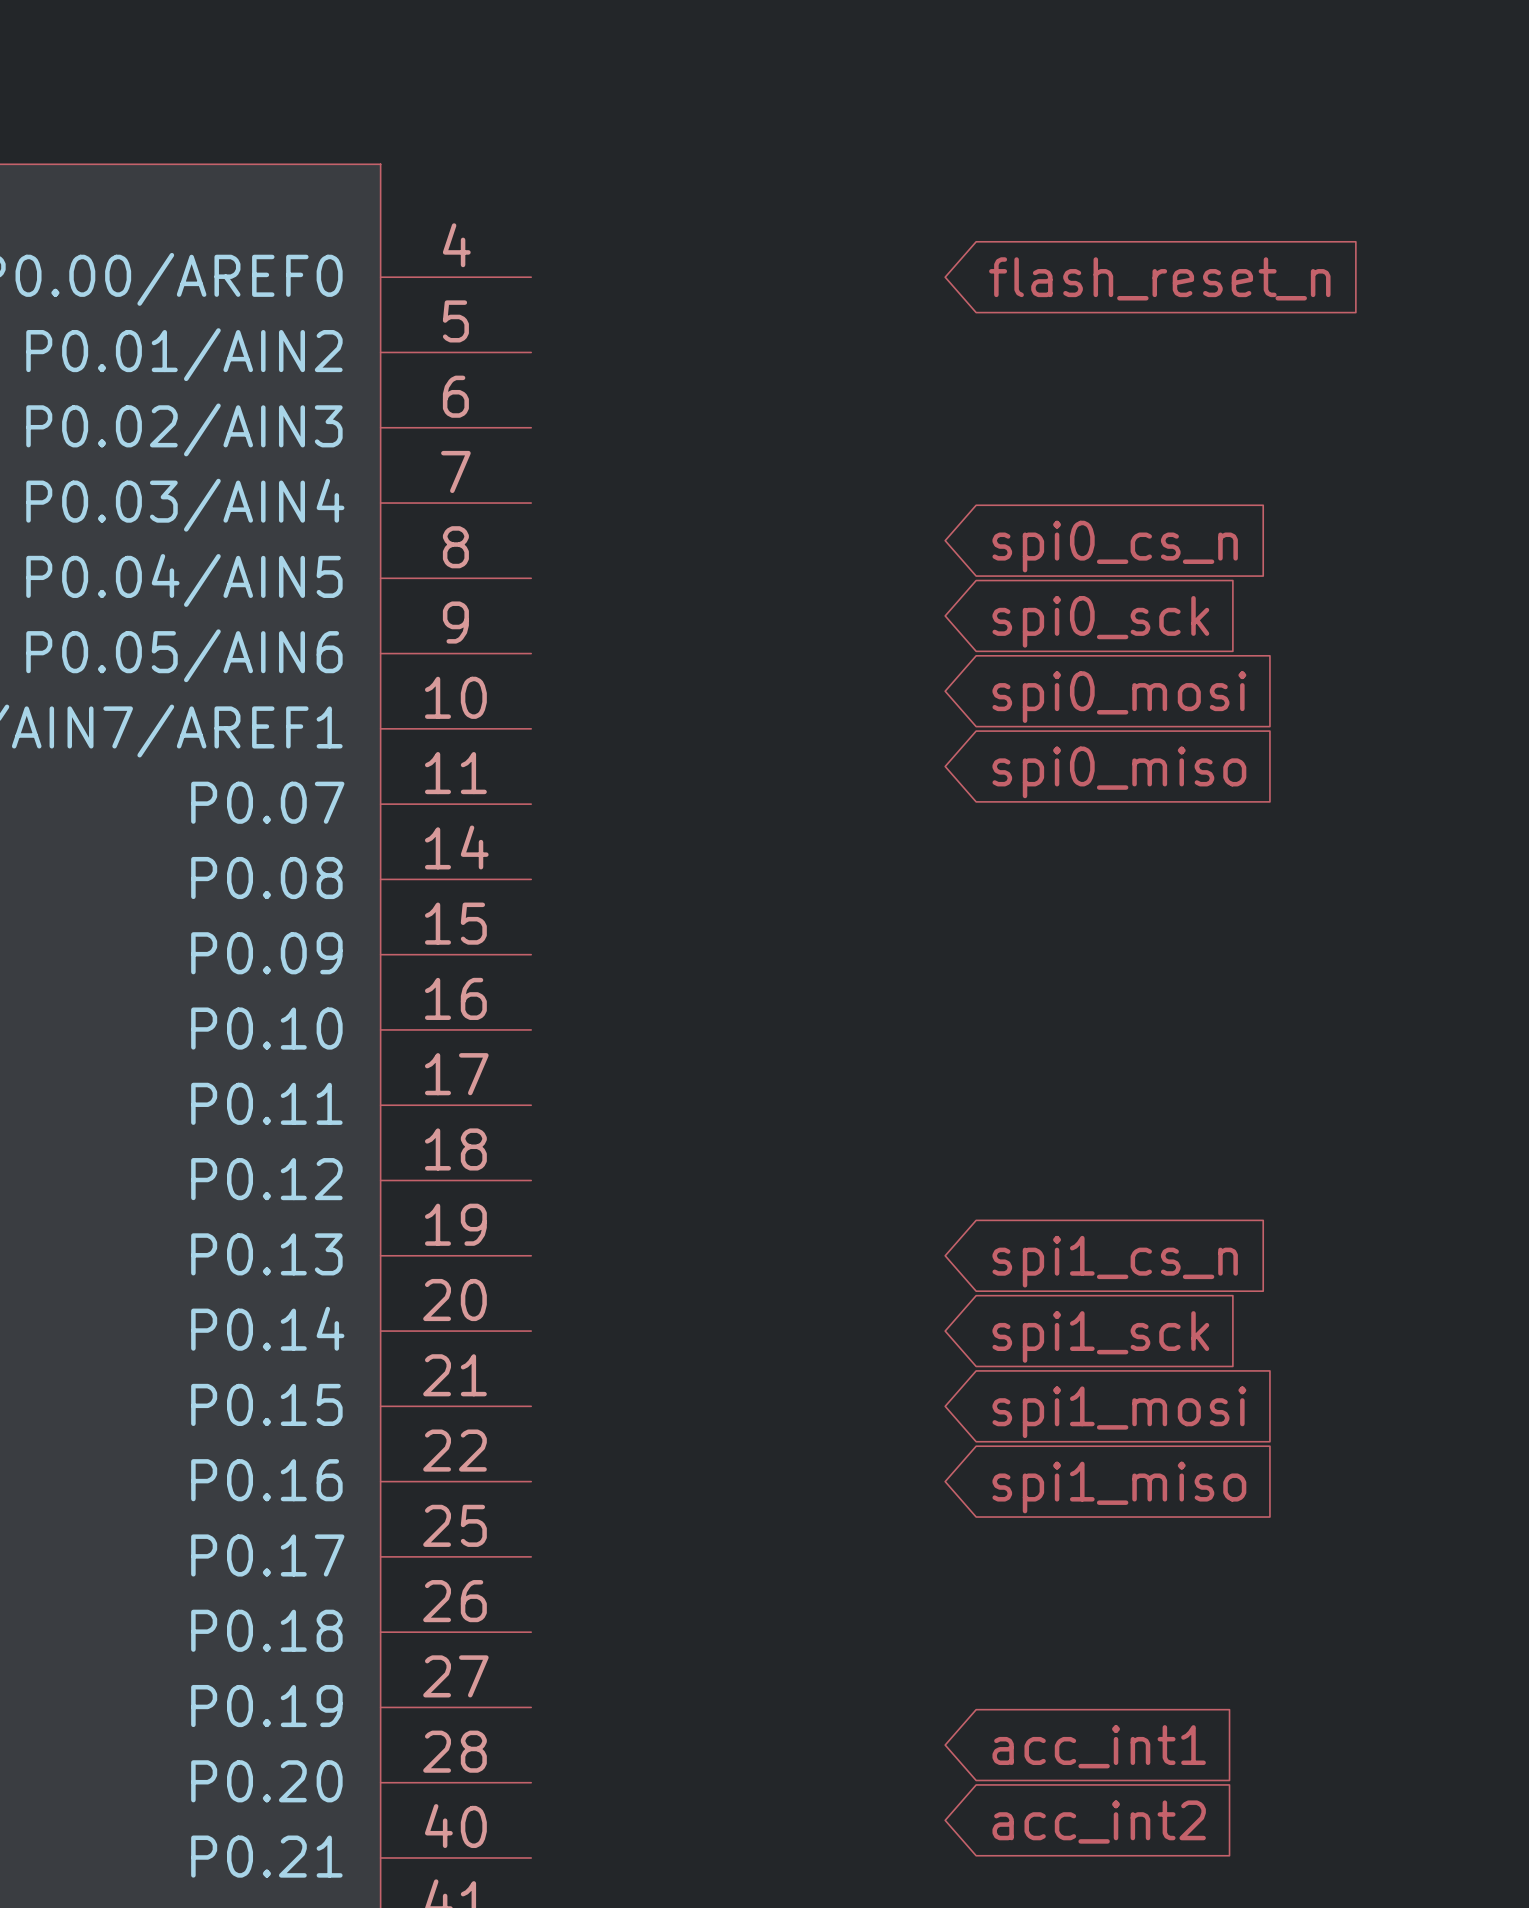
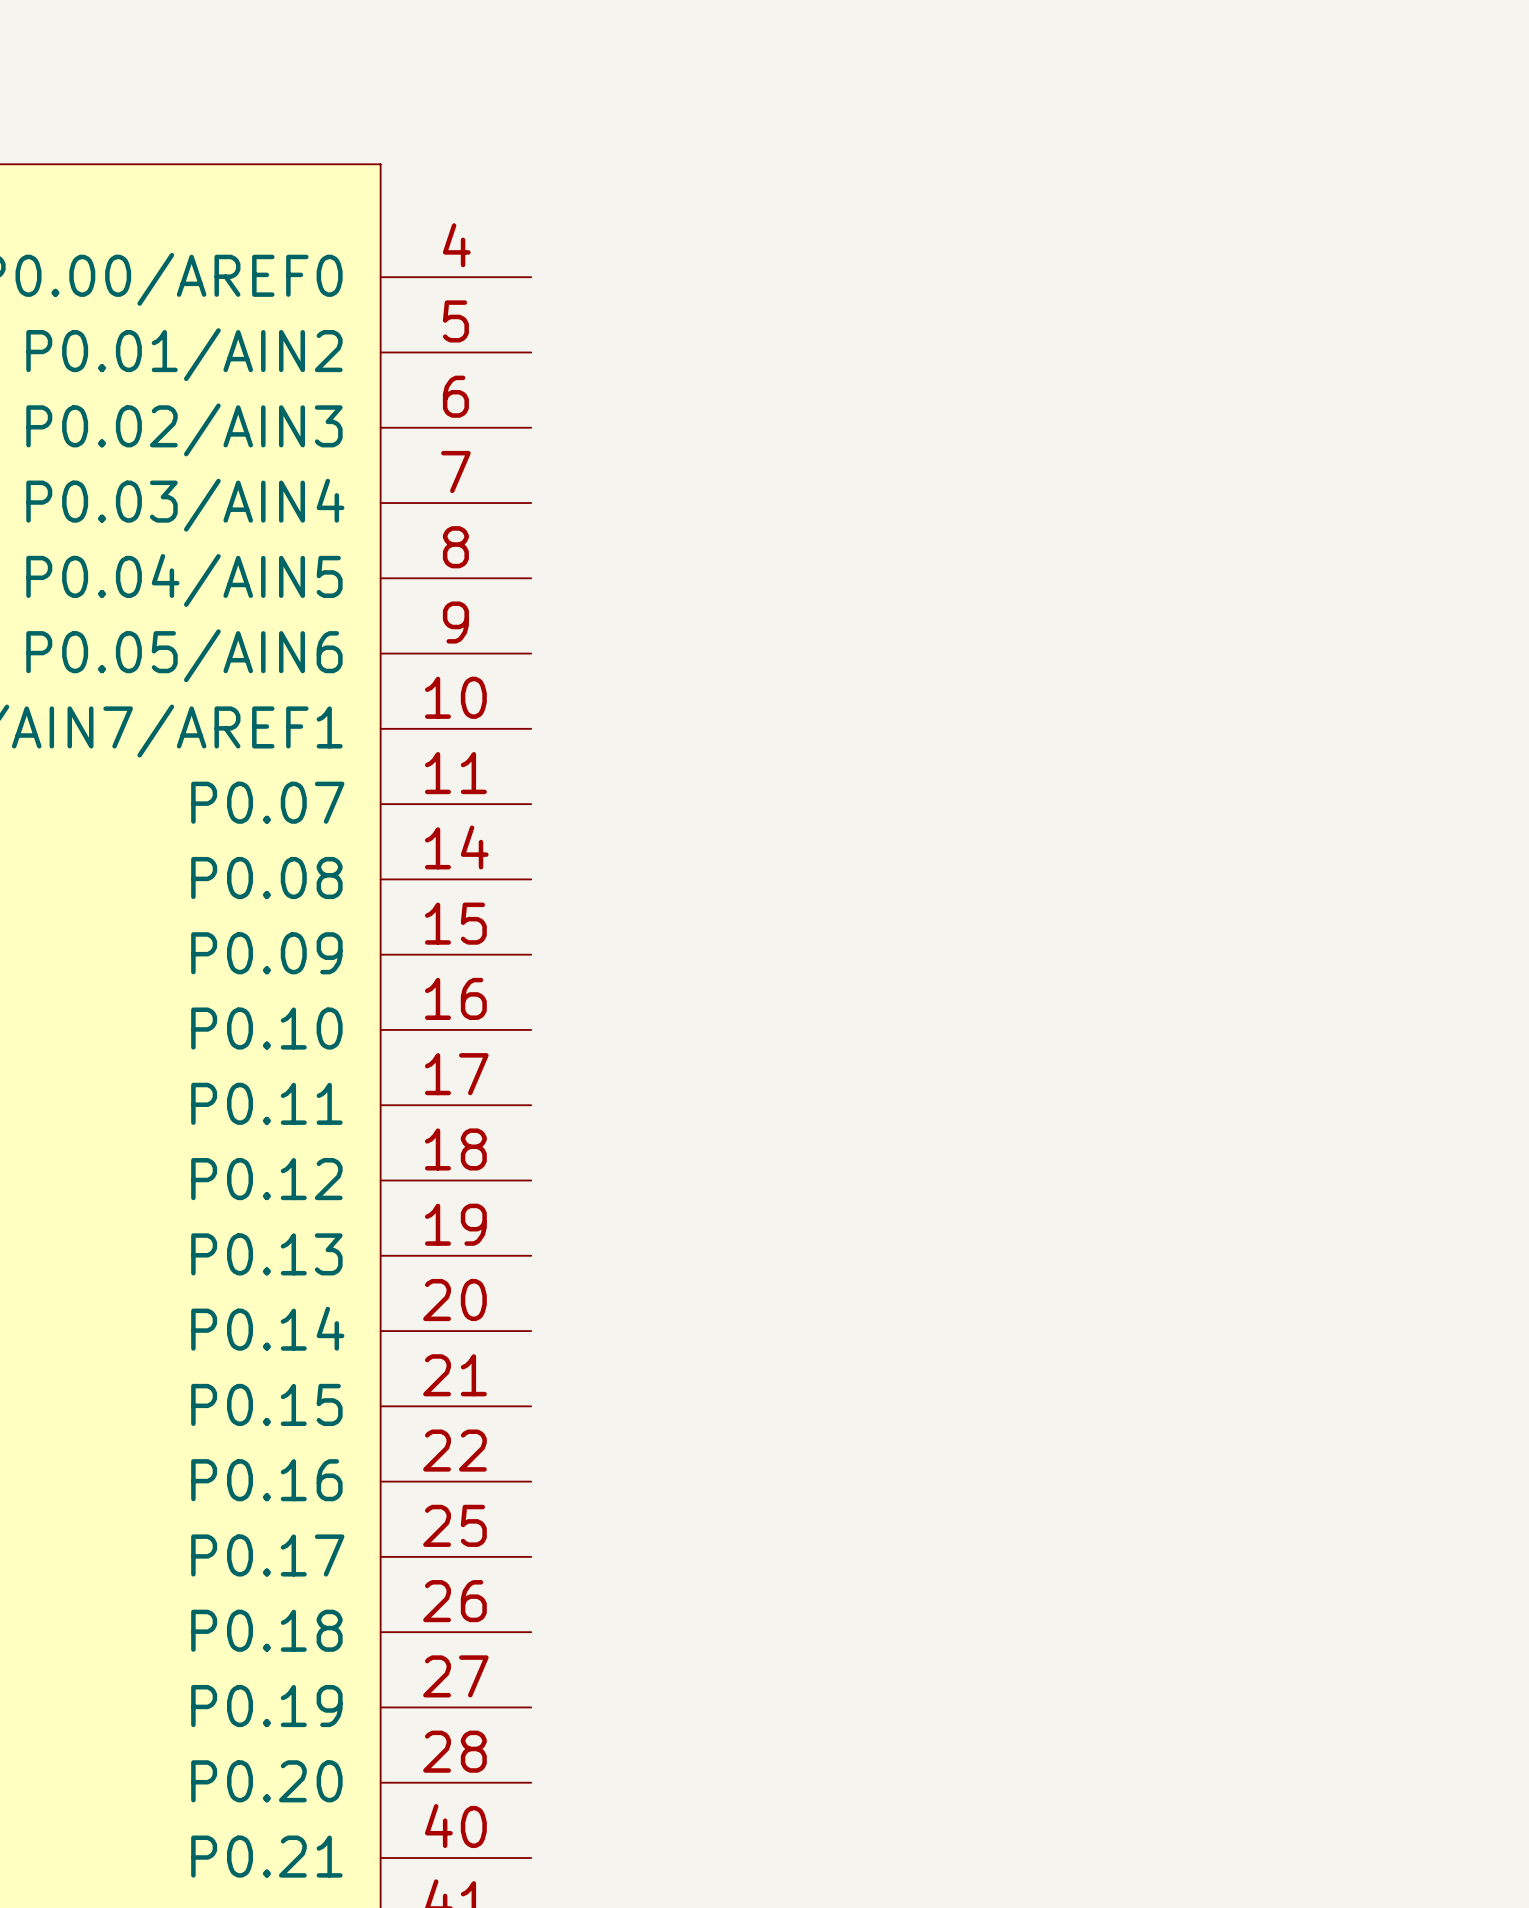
global label: flash_reset_n (1159, 278) -> none
global label: spi0_cs_n (1115, 546) -> none
global label: spi0_sck (1100, 621) -> none
global label: spi0_mosi (1119, 697) -> none
global label: spi0_miso (1119, 772) -> none
global label: spi1_cs_n (1115, 1261) -> none
global label: spi1_sck (1100, 1336) -> none
global label: spi1_mosi (1119, 1412) -> none
global label: spi1_miso (1119, 1487) -> none
global label: acc_int1 (1099, 1746) -> none
global label: acc_int2 (1099, 1822) -> none

